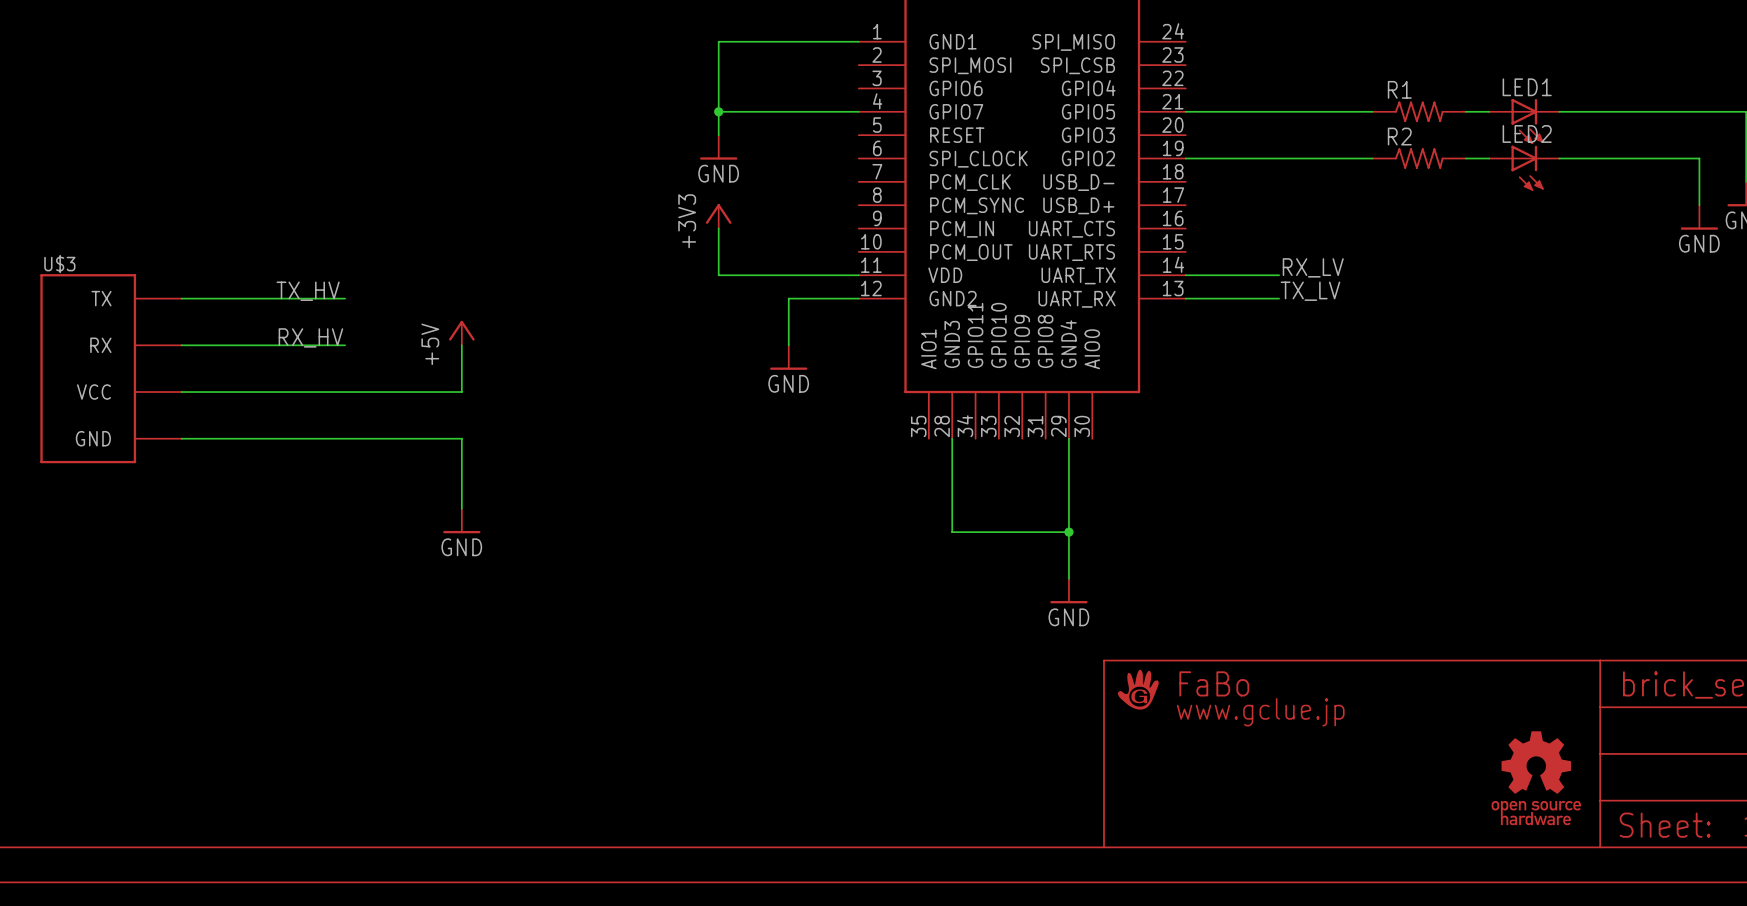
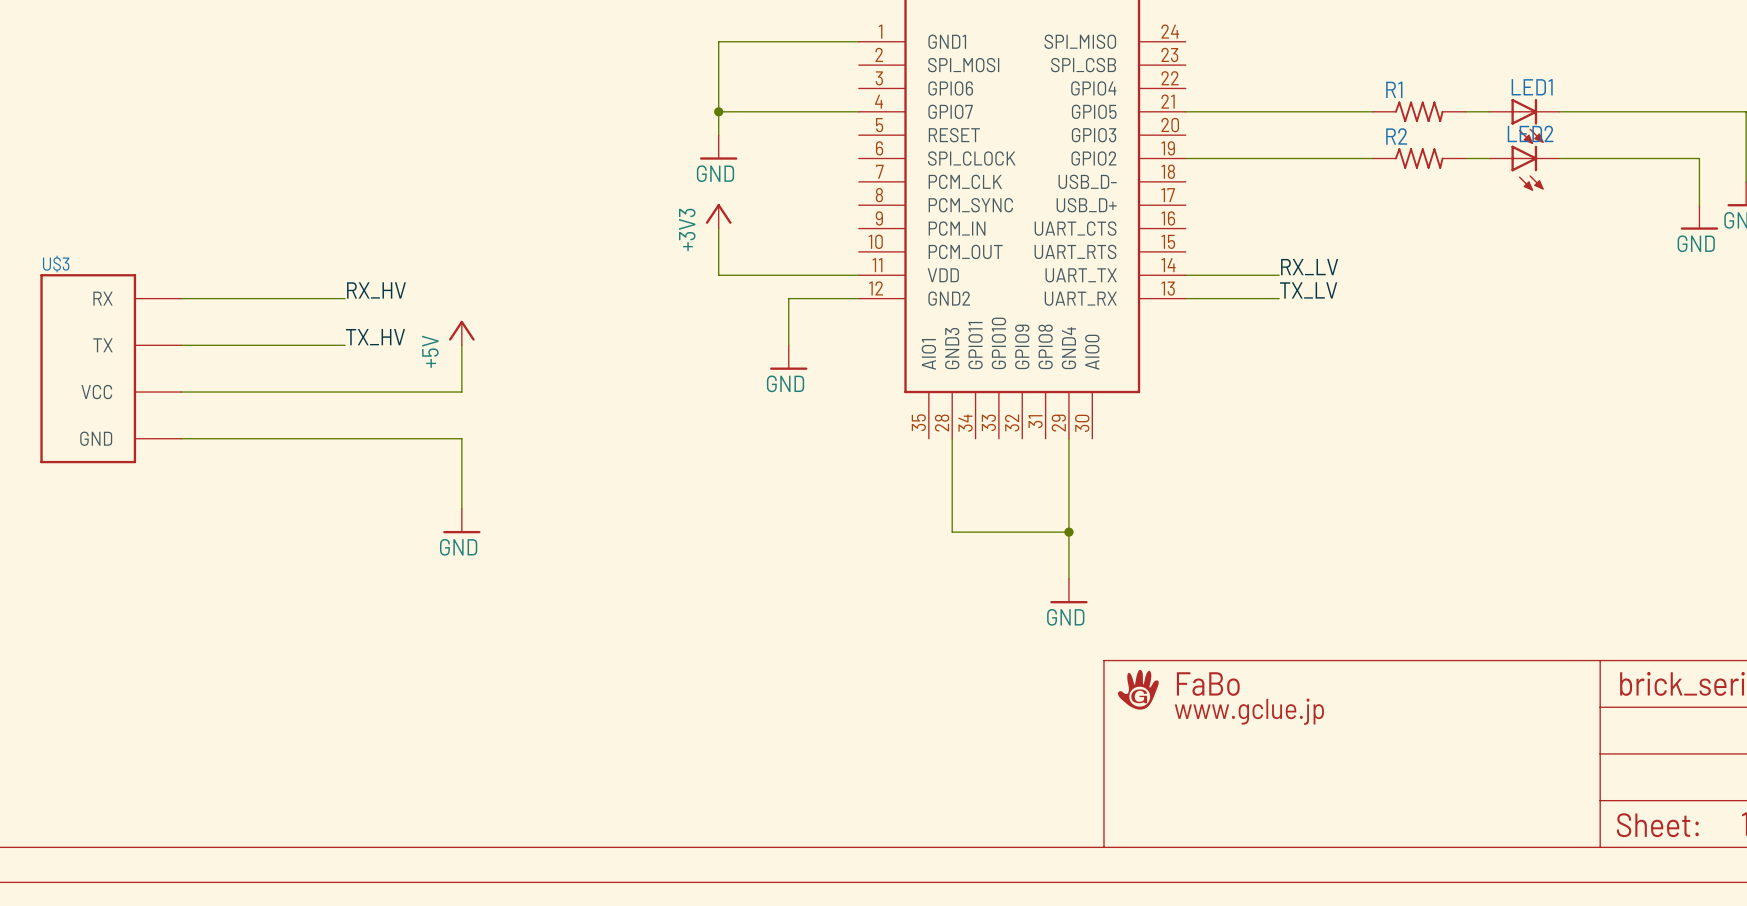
label position: TX_HV (308, 291) -> TX_HV (375, 337)
U$3 pin name: TX (101, 298) -> RX (103, 298)
label position: RX_HV (310, 337) -> RX_HV (376, 290)
U$3 pin name: RX (100, 345) -> TX (102, 345)
part: (1536, 778) -> none

